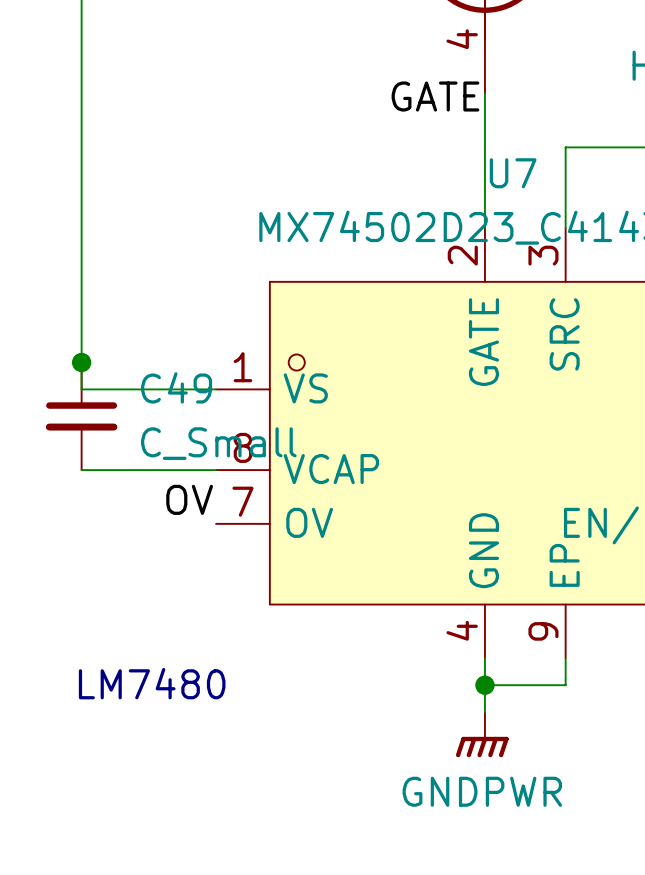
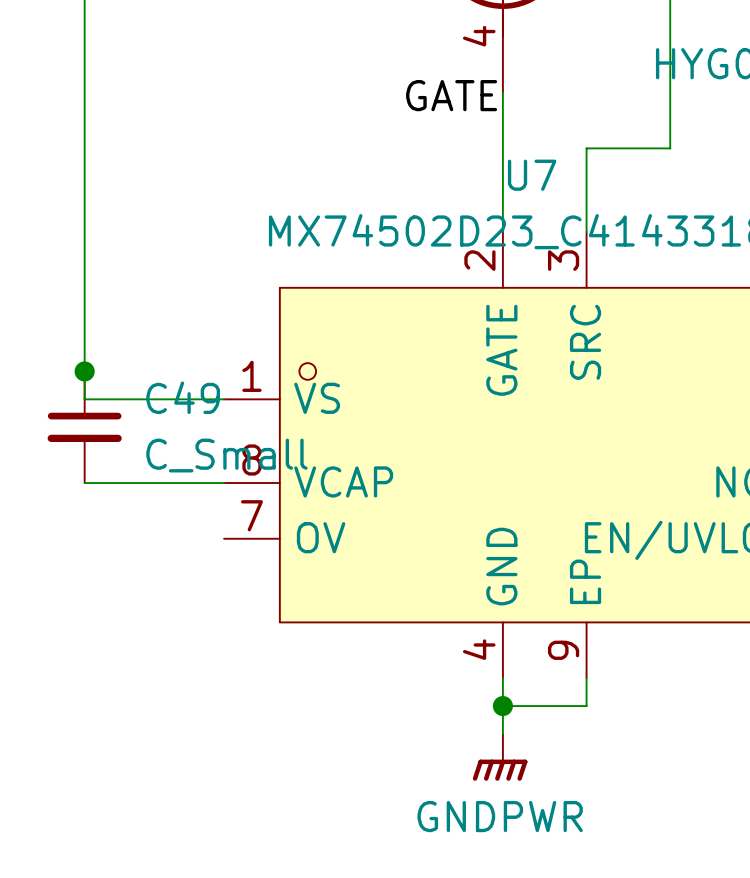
label: OV (189, 499) -> none
text: LM7480 (152, 683) -> none

